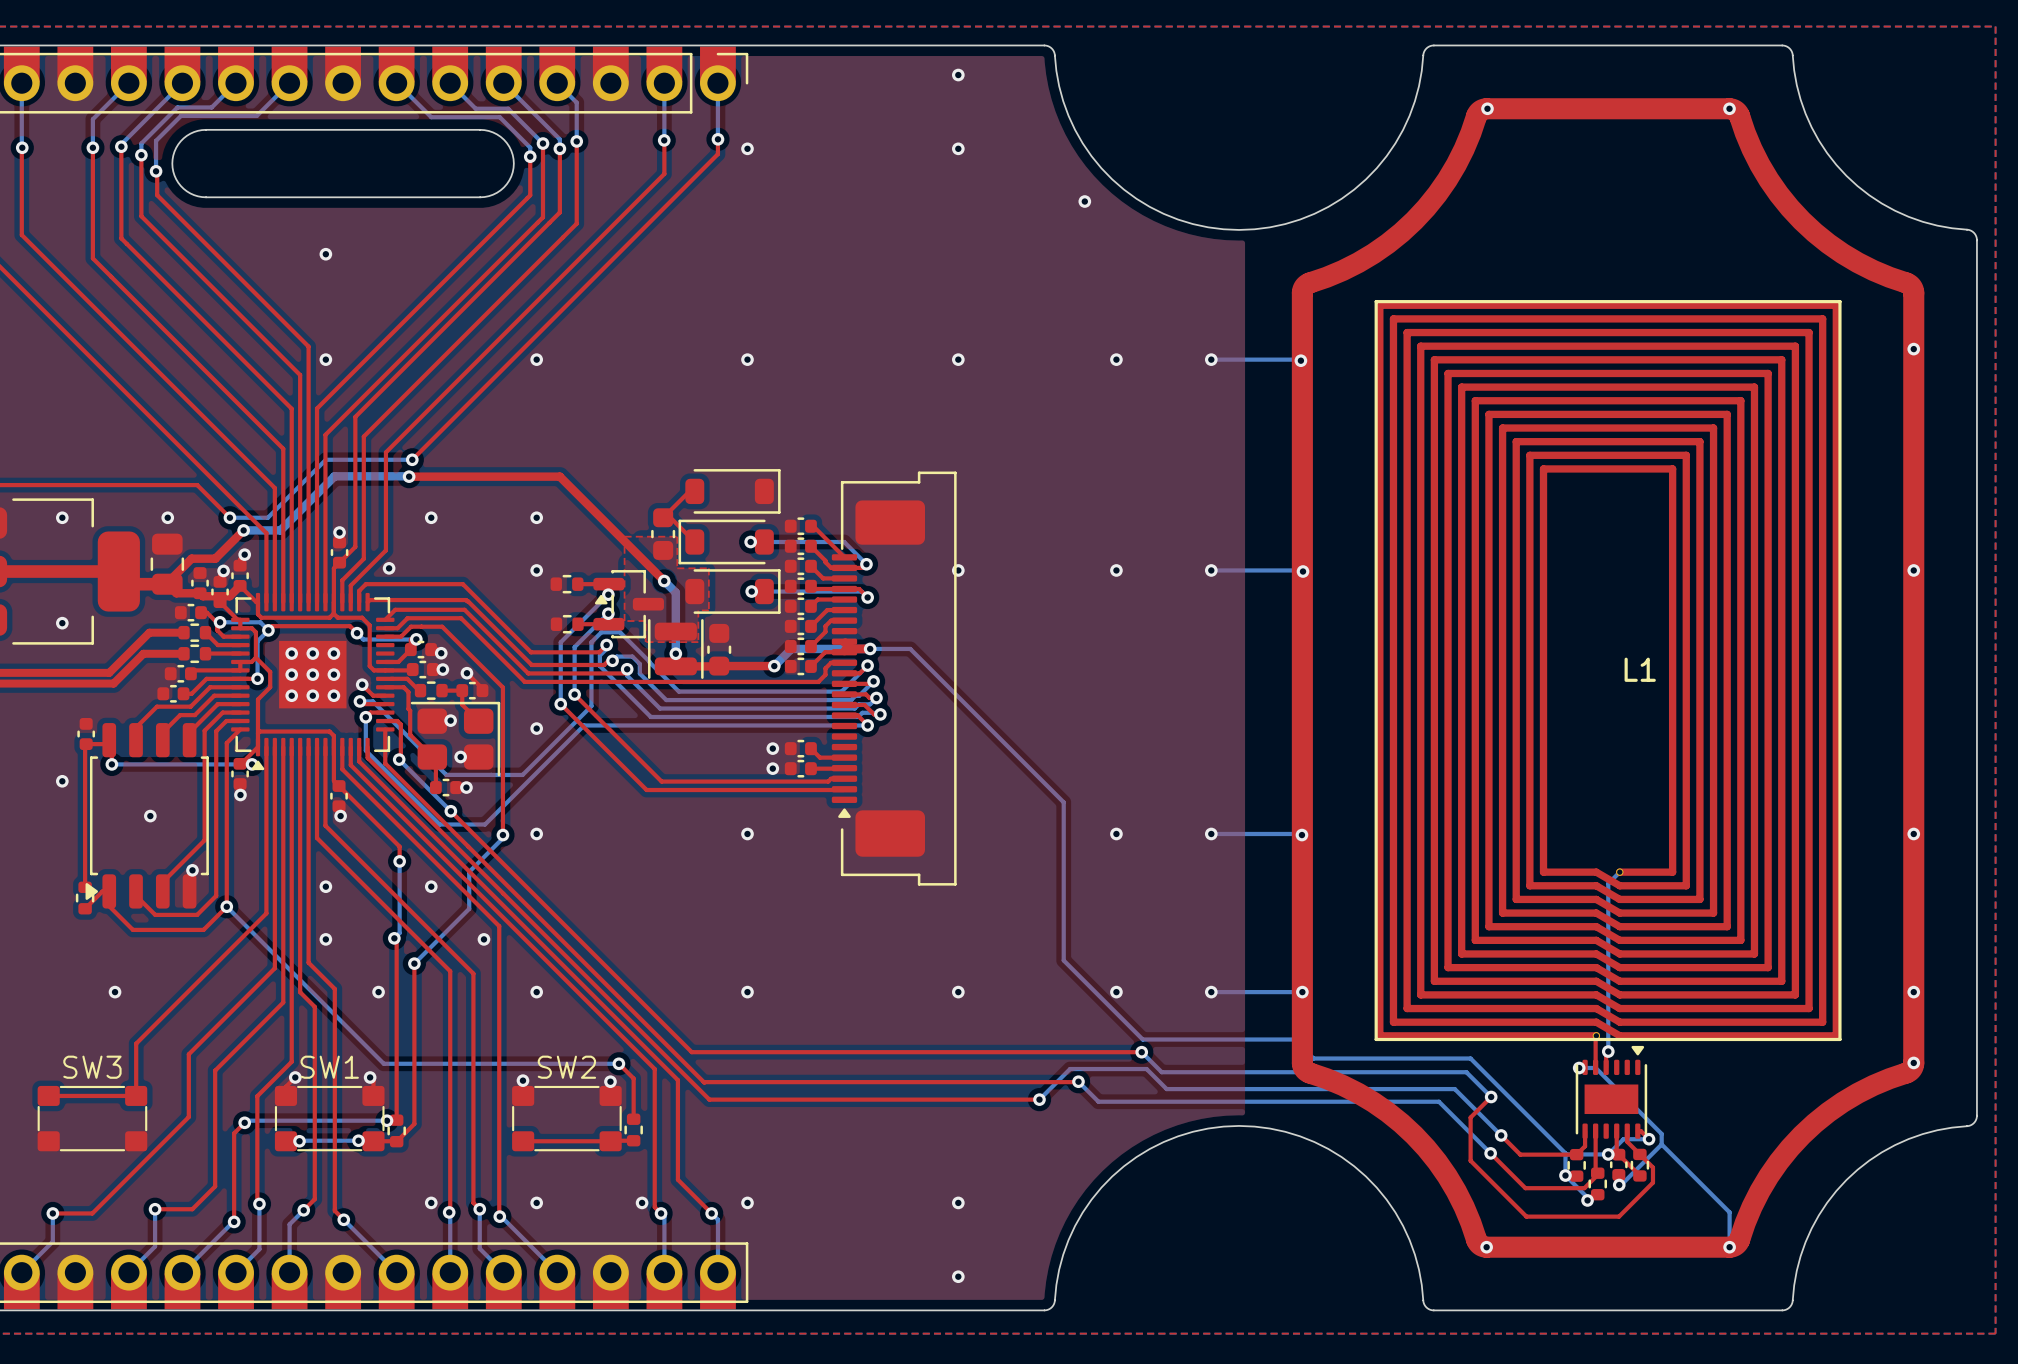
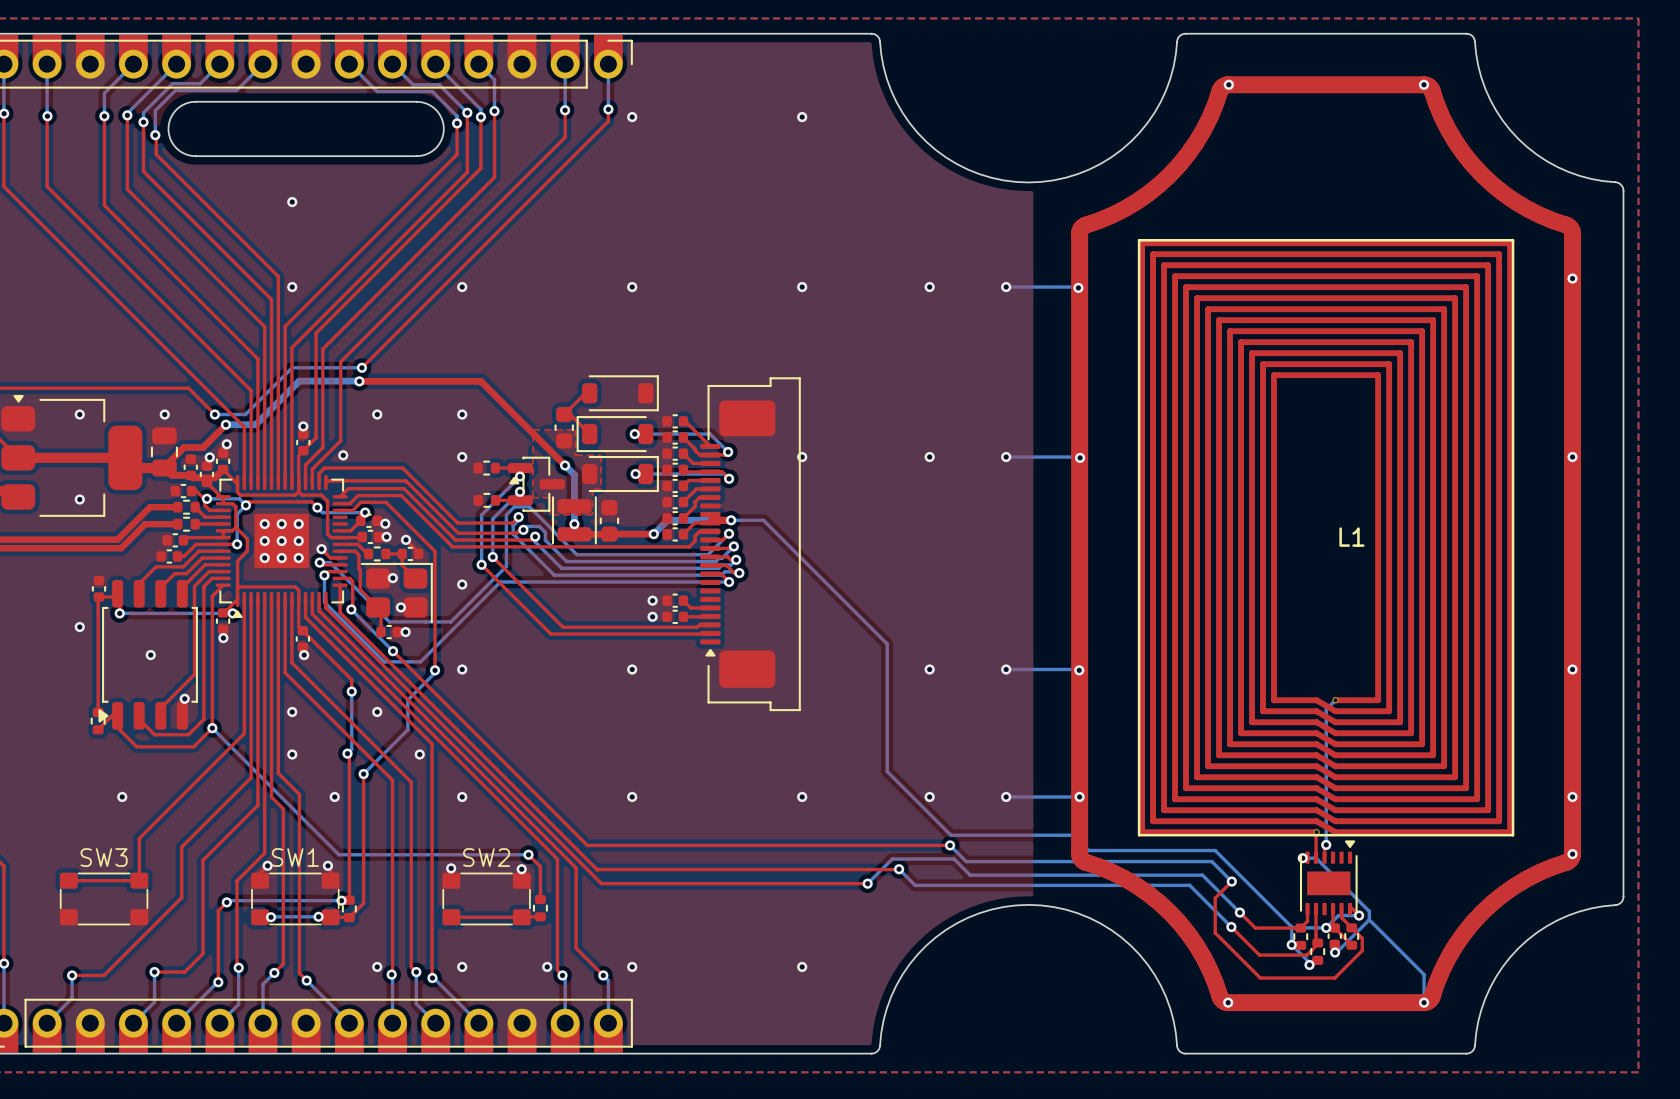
via: (958, 75) -> none
via: (1084, 201) -> none
via: (958, 1276) -> none

